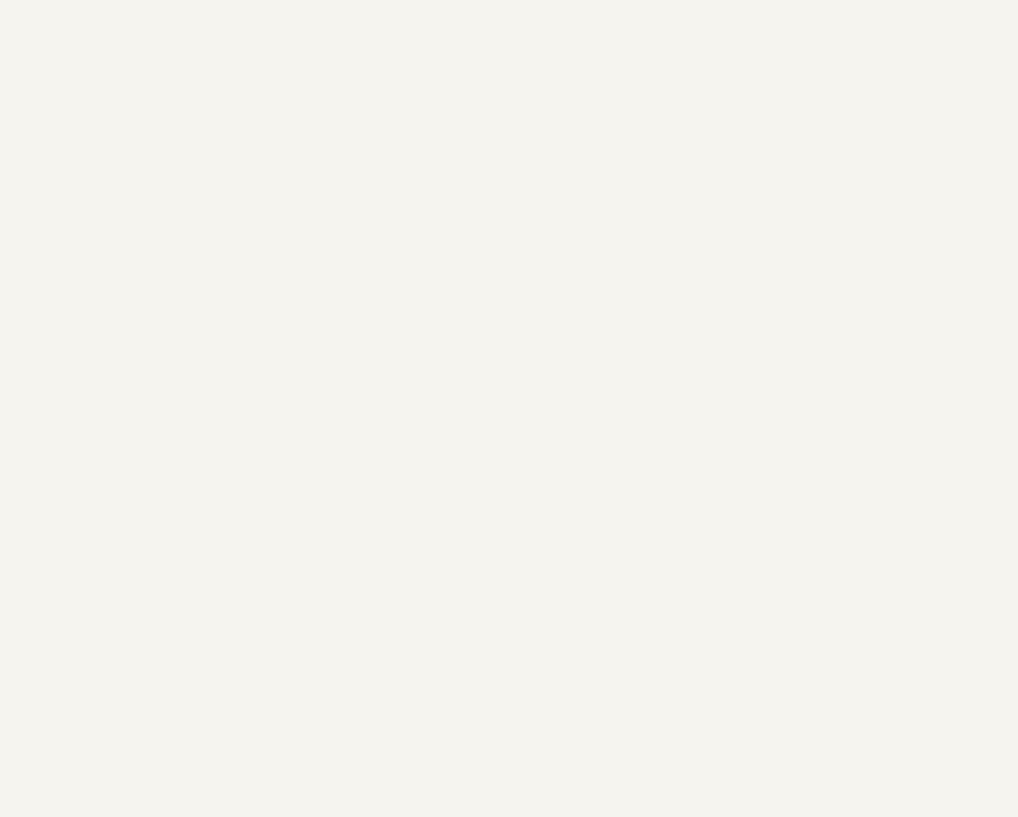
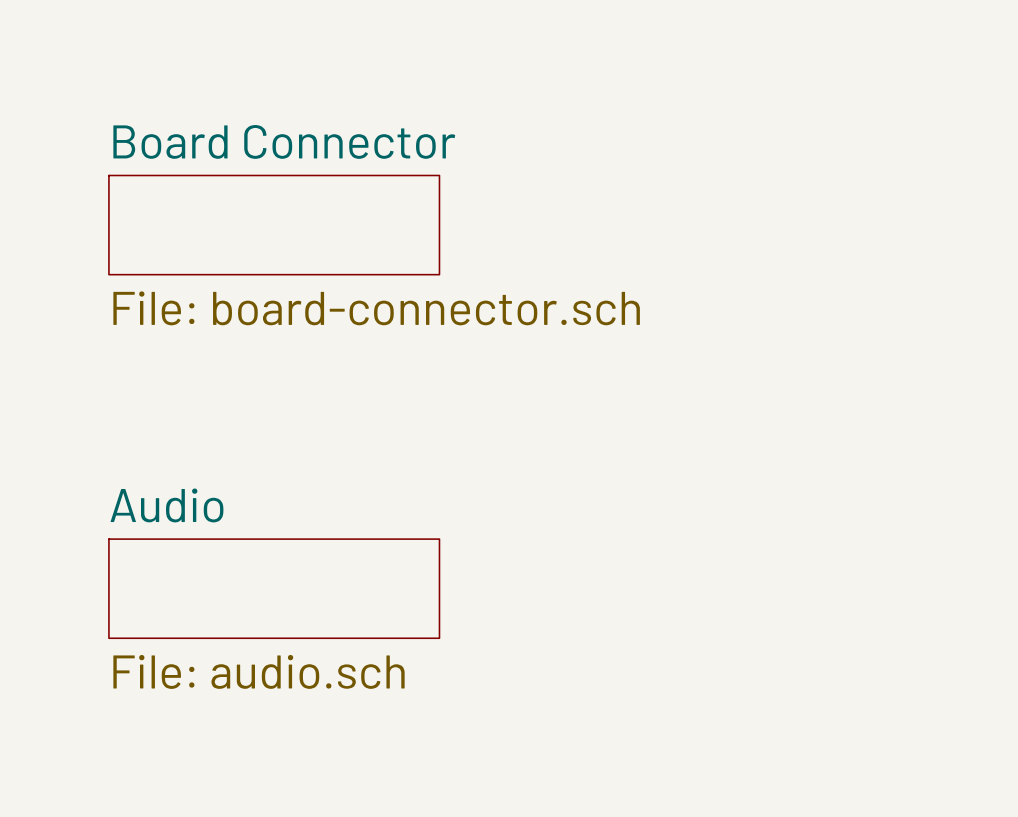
sheet Board Connector: none -> File: board-connector.sch (274, 225)
sheet Audio: none -> File: audio.sch (274, 588)

